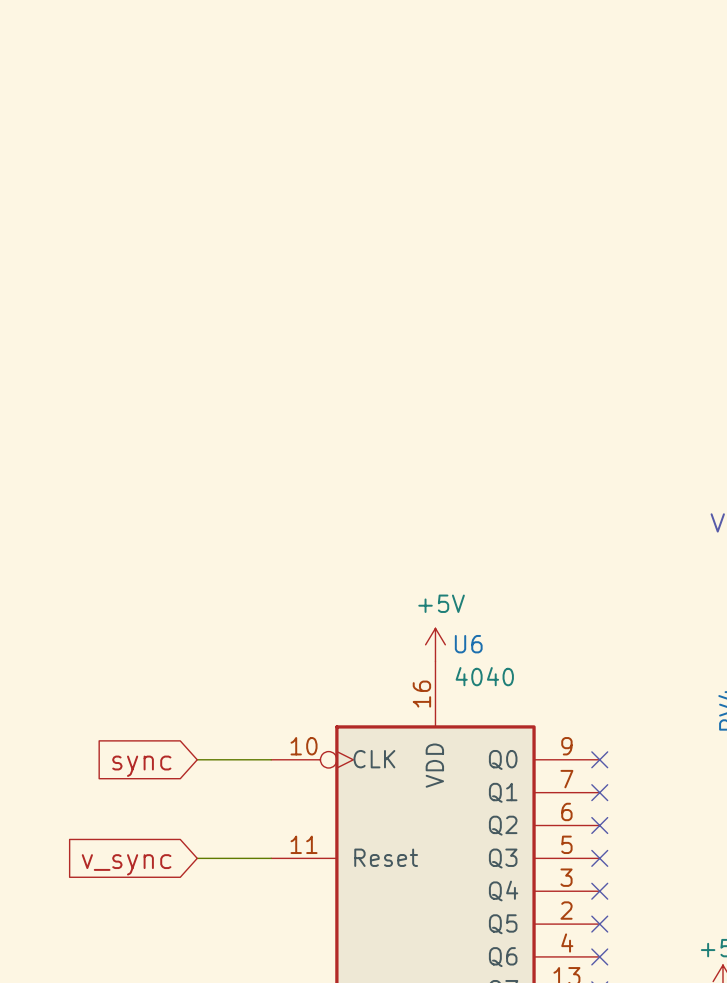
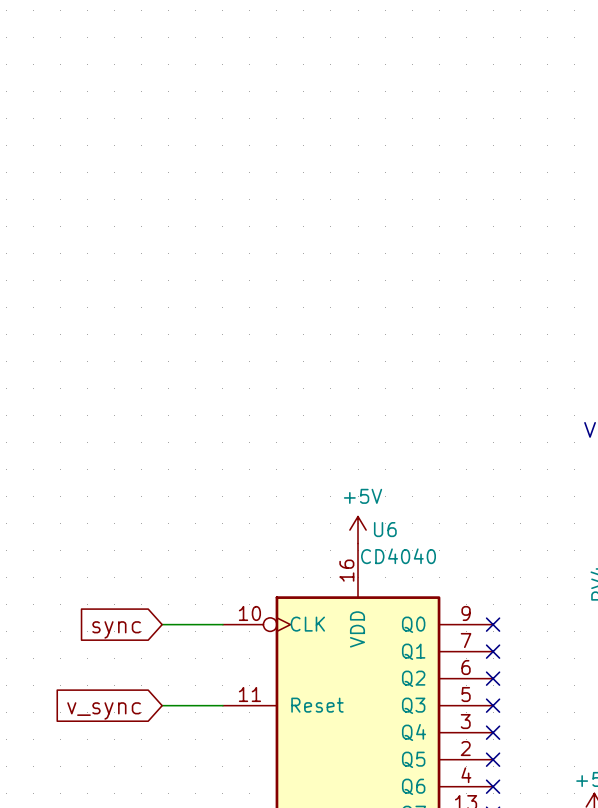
U6 value: 4040 (484, 676) -> CD4040 (398, 556)

